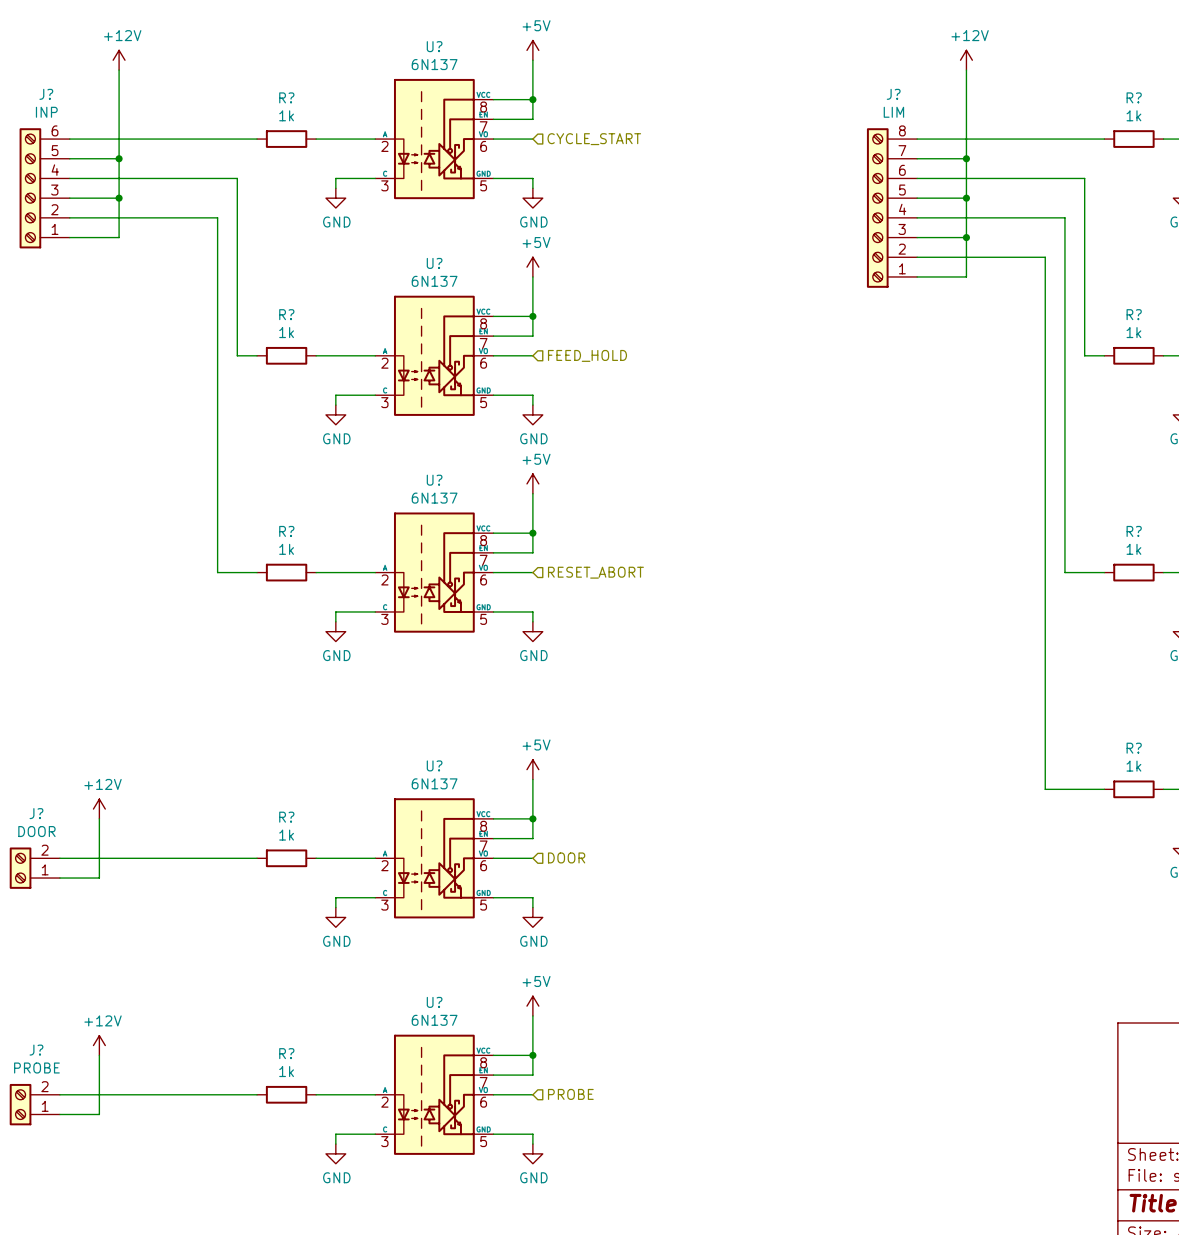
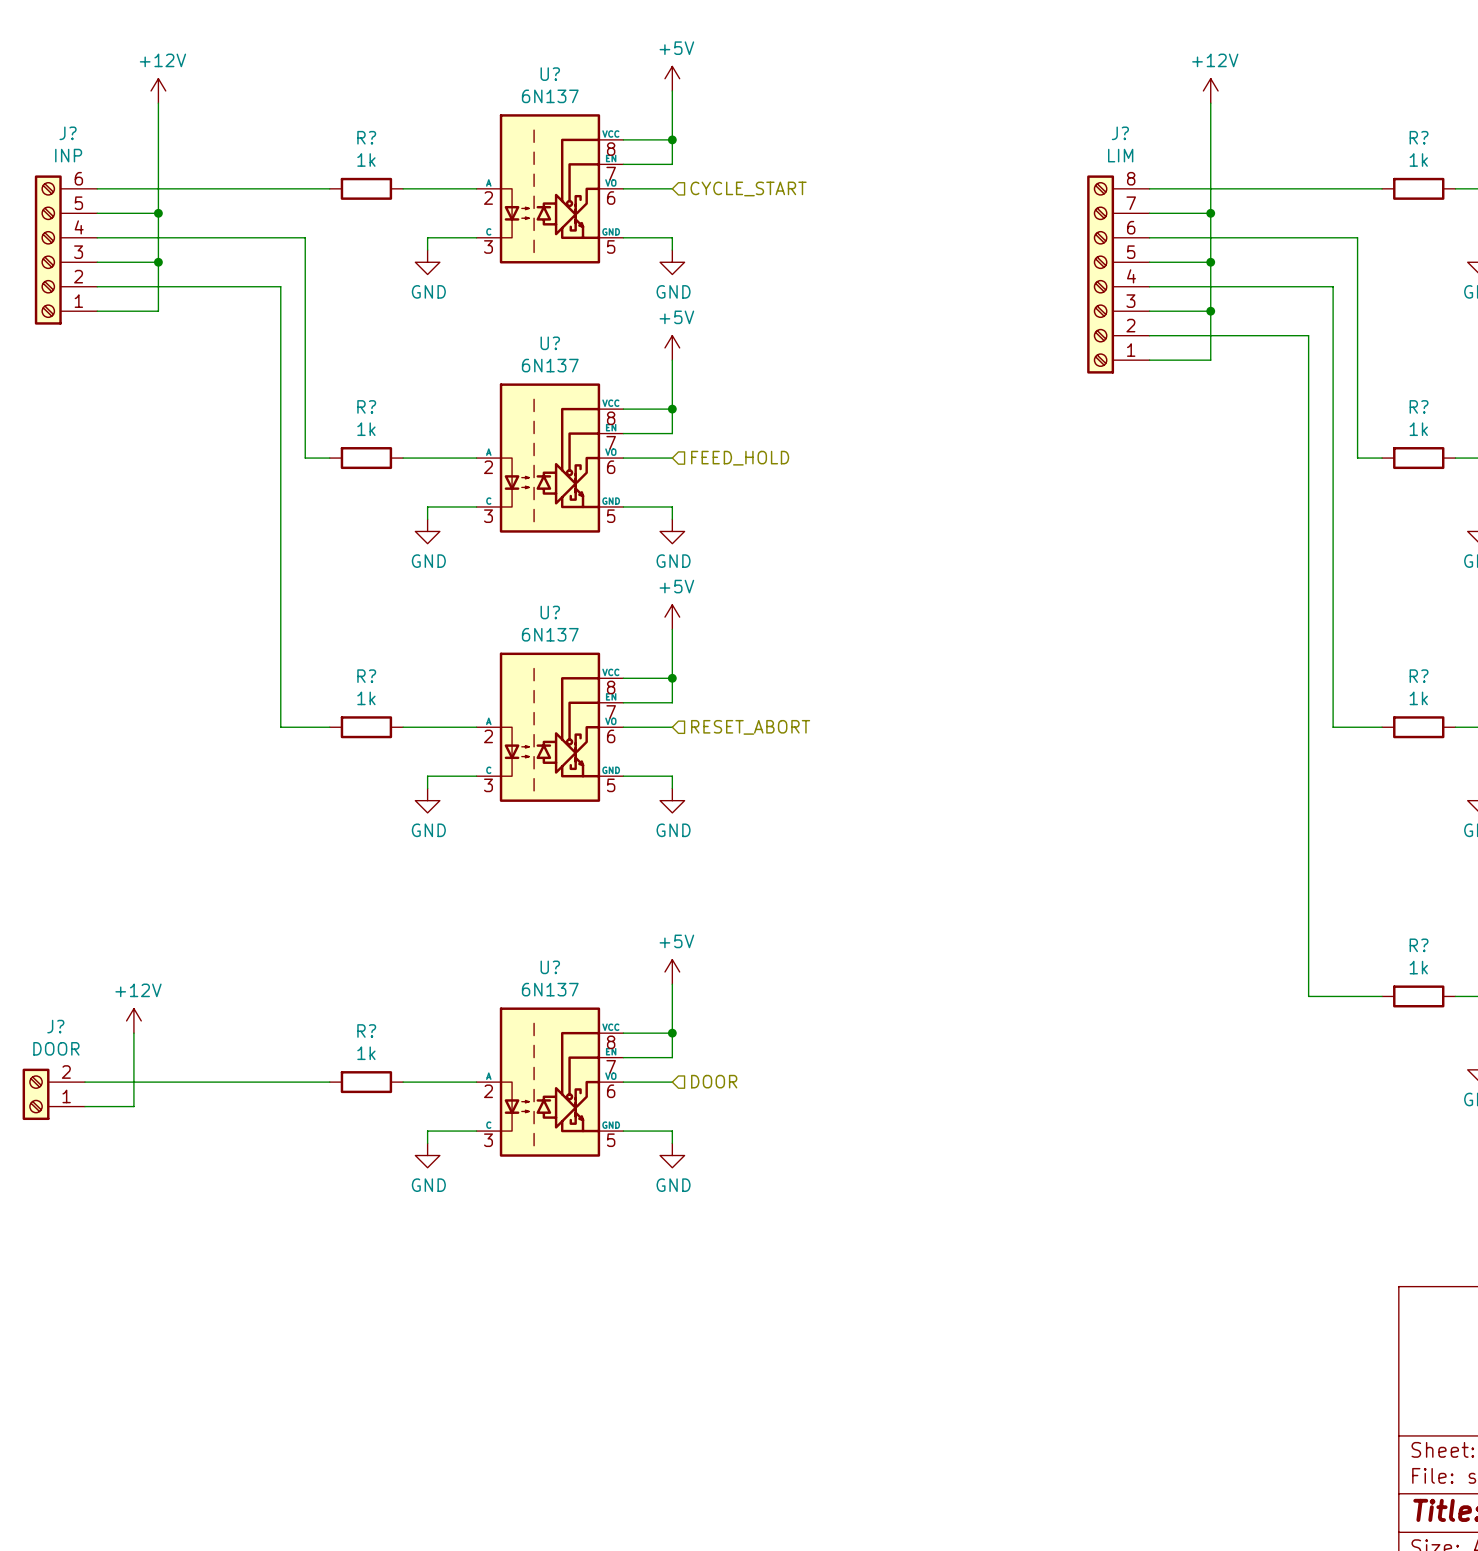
power symbol: +5V (532, 1006) -> none
wire: (532, 1015) (532, 1075) (493, 1075) -> none
power symbol: +12V (99, 1045) -> none
wire: (99, 1055) (99, 1114) (59, 1114) -> none
wire: (493, 1055) (532, 1055) -> none
junction: (532, 1055) -> none
wire: (59, 1094) (257, 1094) -> none
R?: 1k (286, 1094) -> none
wire: (316, 1094) (375, 1094) -> none
U?: 6N137 (434, 1094) -> none
wire: (493, 1094) (532, 1094) -> none
hierarchical label: PROBE (570, 1094) -> none
J?: PROBE (34, 1104) -> none
wire: (375, 1134) (335, 1134) (335, 1144) -> none
wire: (493, 1134) (532, 1134) (532, 1144) -> none
power symbol: GND (335, 1153) -> none
power symbol: GND (532, 1153) -> none

